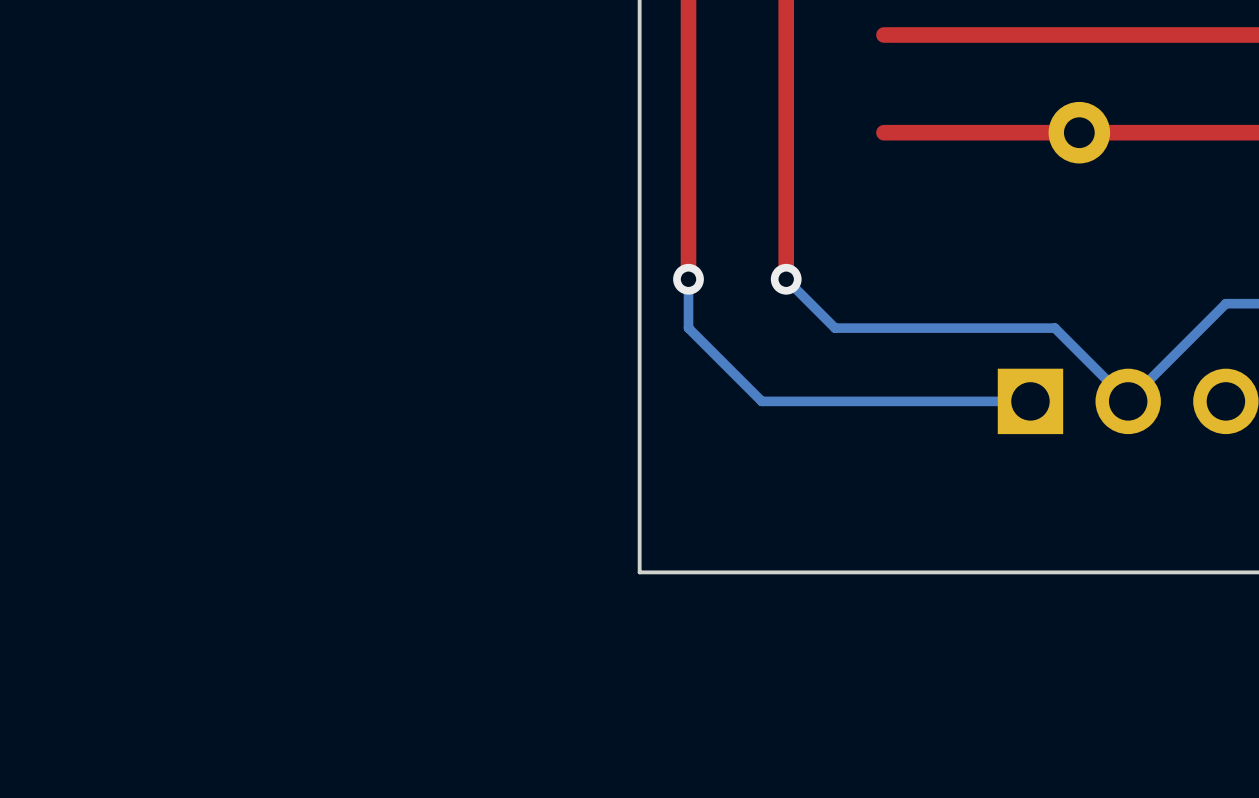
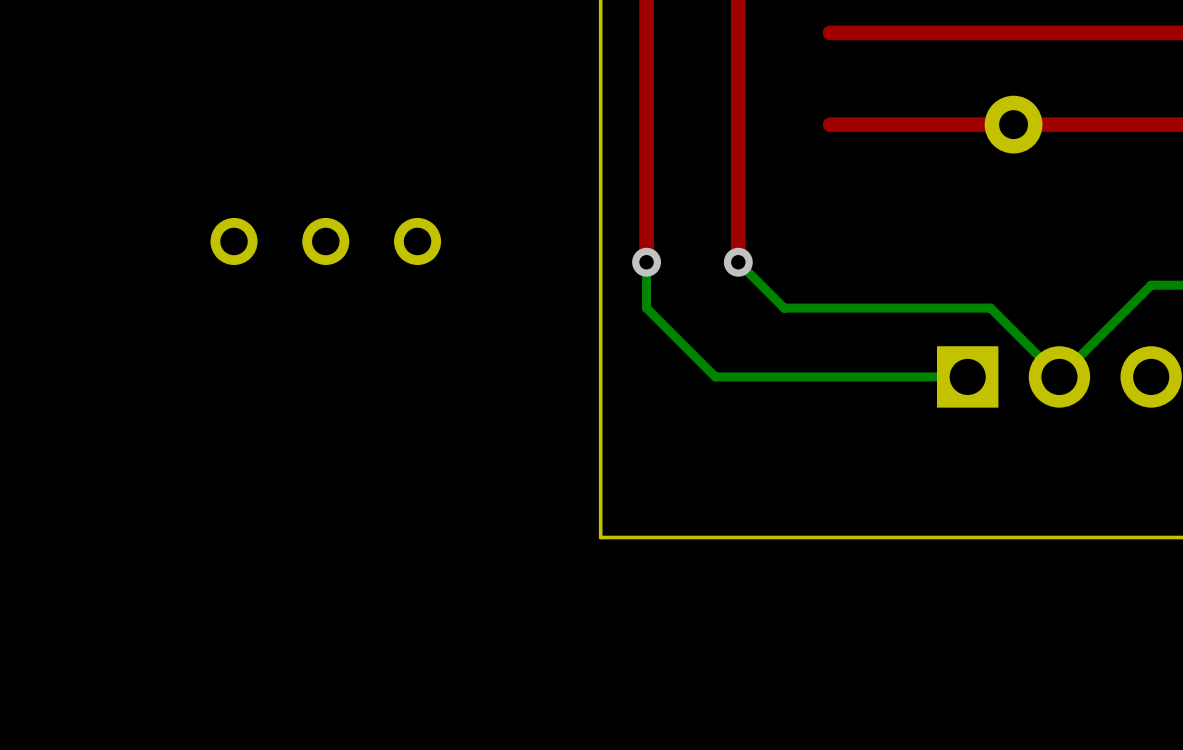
part: none -> (325, 241)

